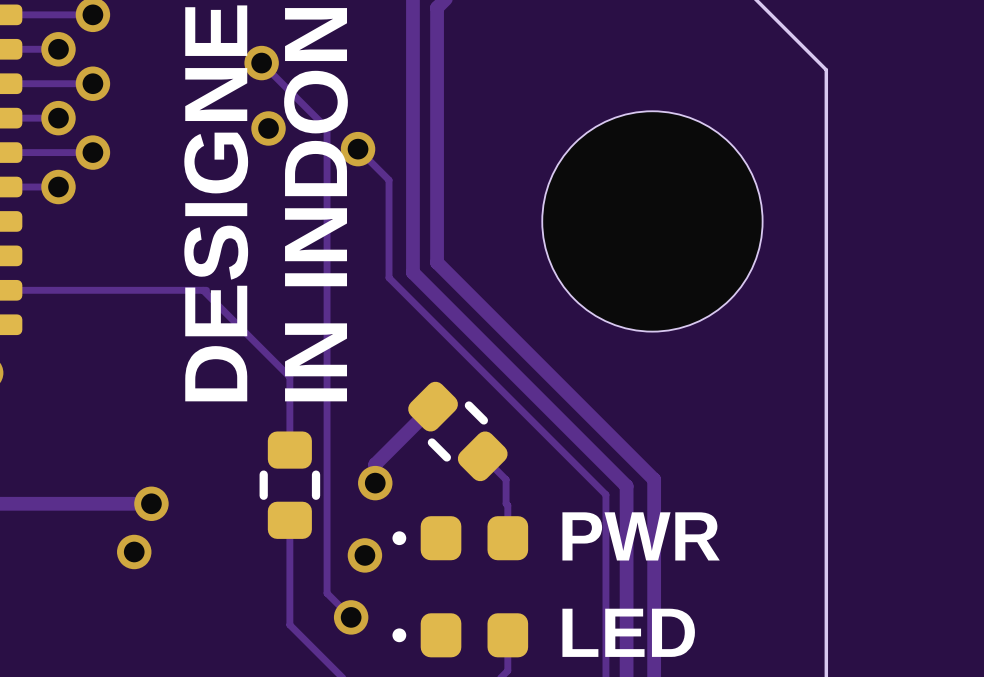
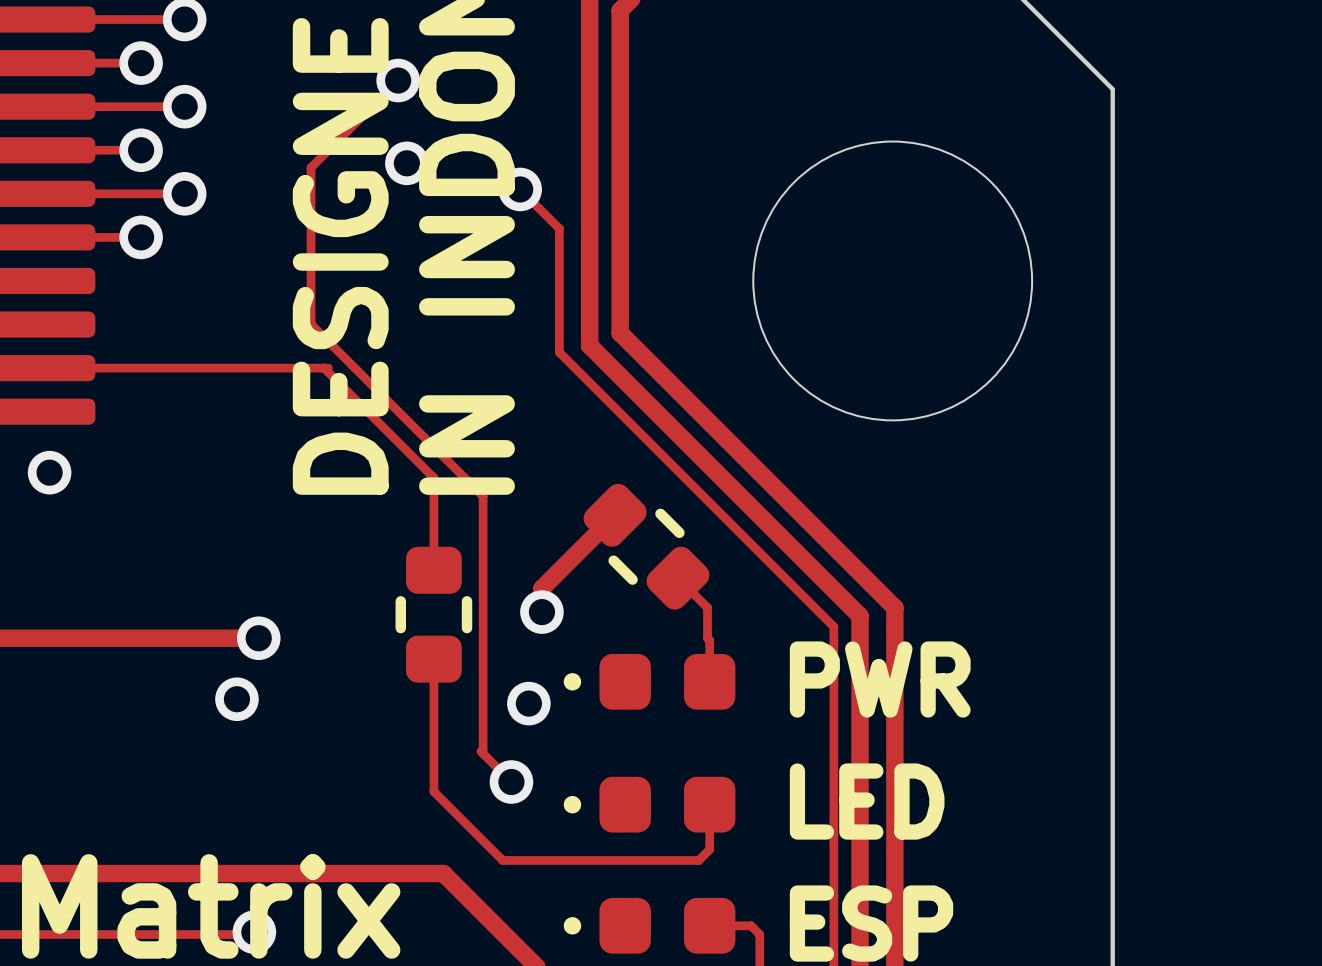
track: (261, 63) (327, 128) (327, 593) -> (398, 80) (311, 167) (311, 324) (483, 496) (483, 753)

